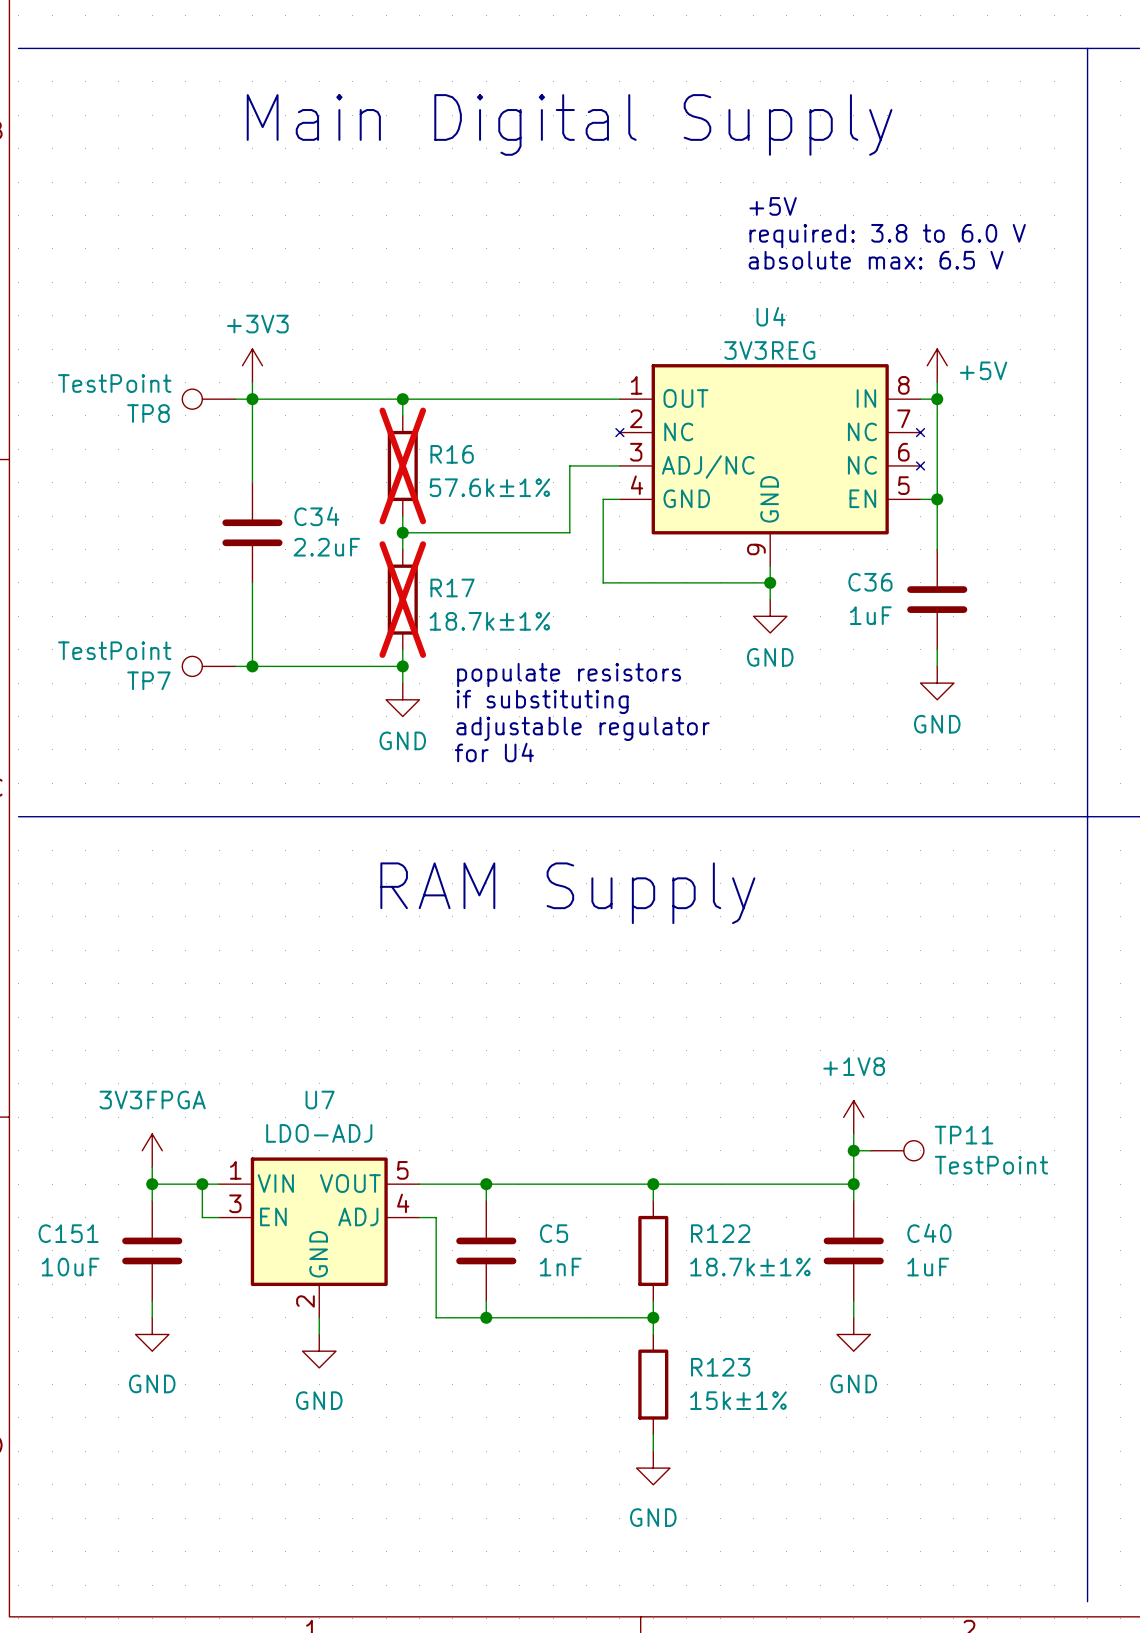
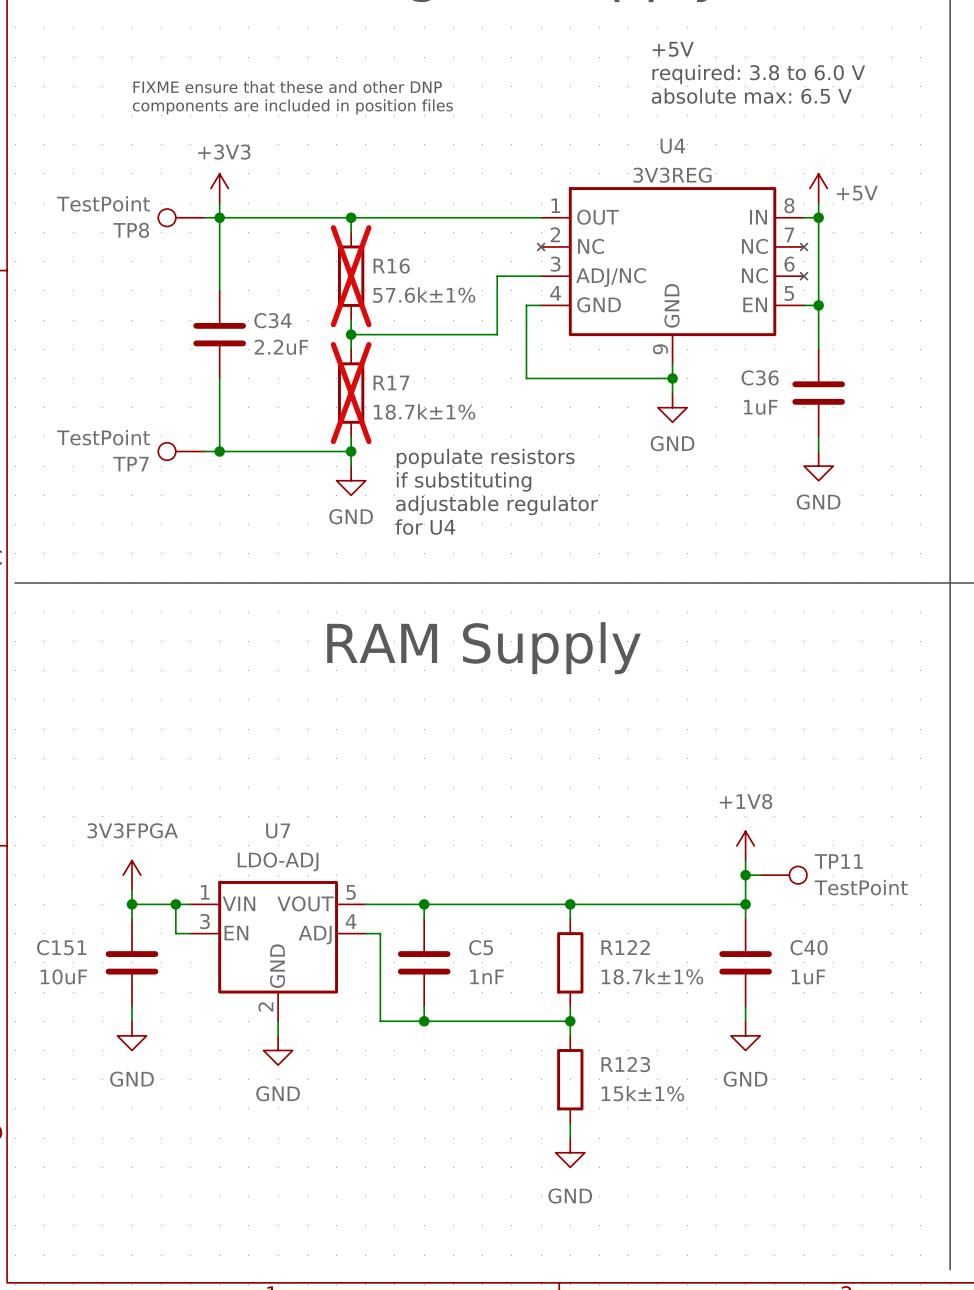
text: none -> FIXME ensure that these and other DNP (287, 87)
text: none -> components are included in position files (292, 106)

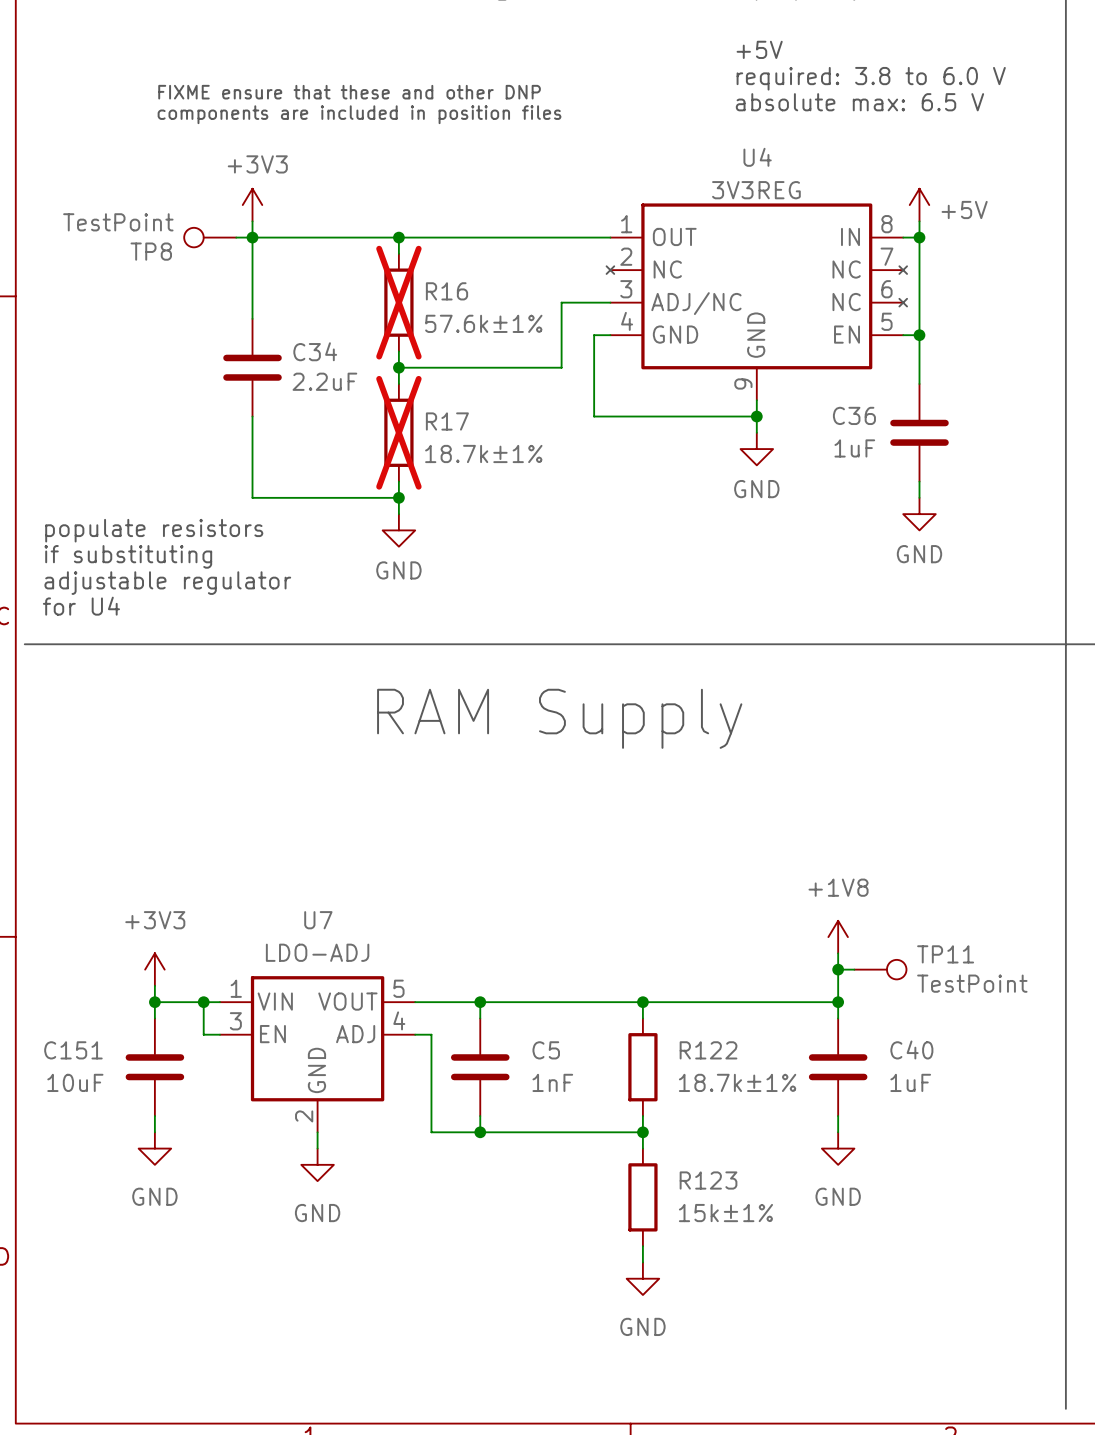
TP7: TestPoint (181, 451) -> none
wire: (205, 451) (219, 451) -> none
junction: (219, 451) -> none
text: populate resistors (485, 458) -> none
text: none -> populate resistors (154, 530)
text: if substituting (464, 481) -> none
text: none -> if substituting (128, 556)
text: adjustable regulator (497, 505) -> none
text: none -> adjustable regulator (167, 583)
text: for U4 (425, 527) -> none
text: none -> for U4 (81, 606)
power symbol: 3V3FPGA (132, 875) -> +3V3 (154, 969)

